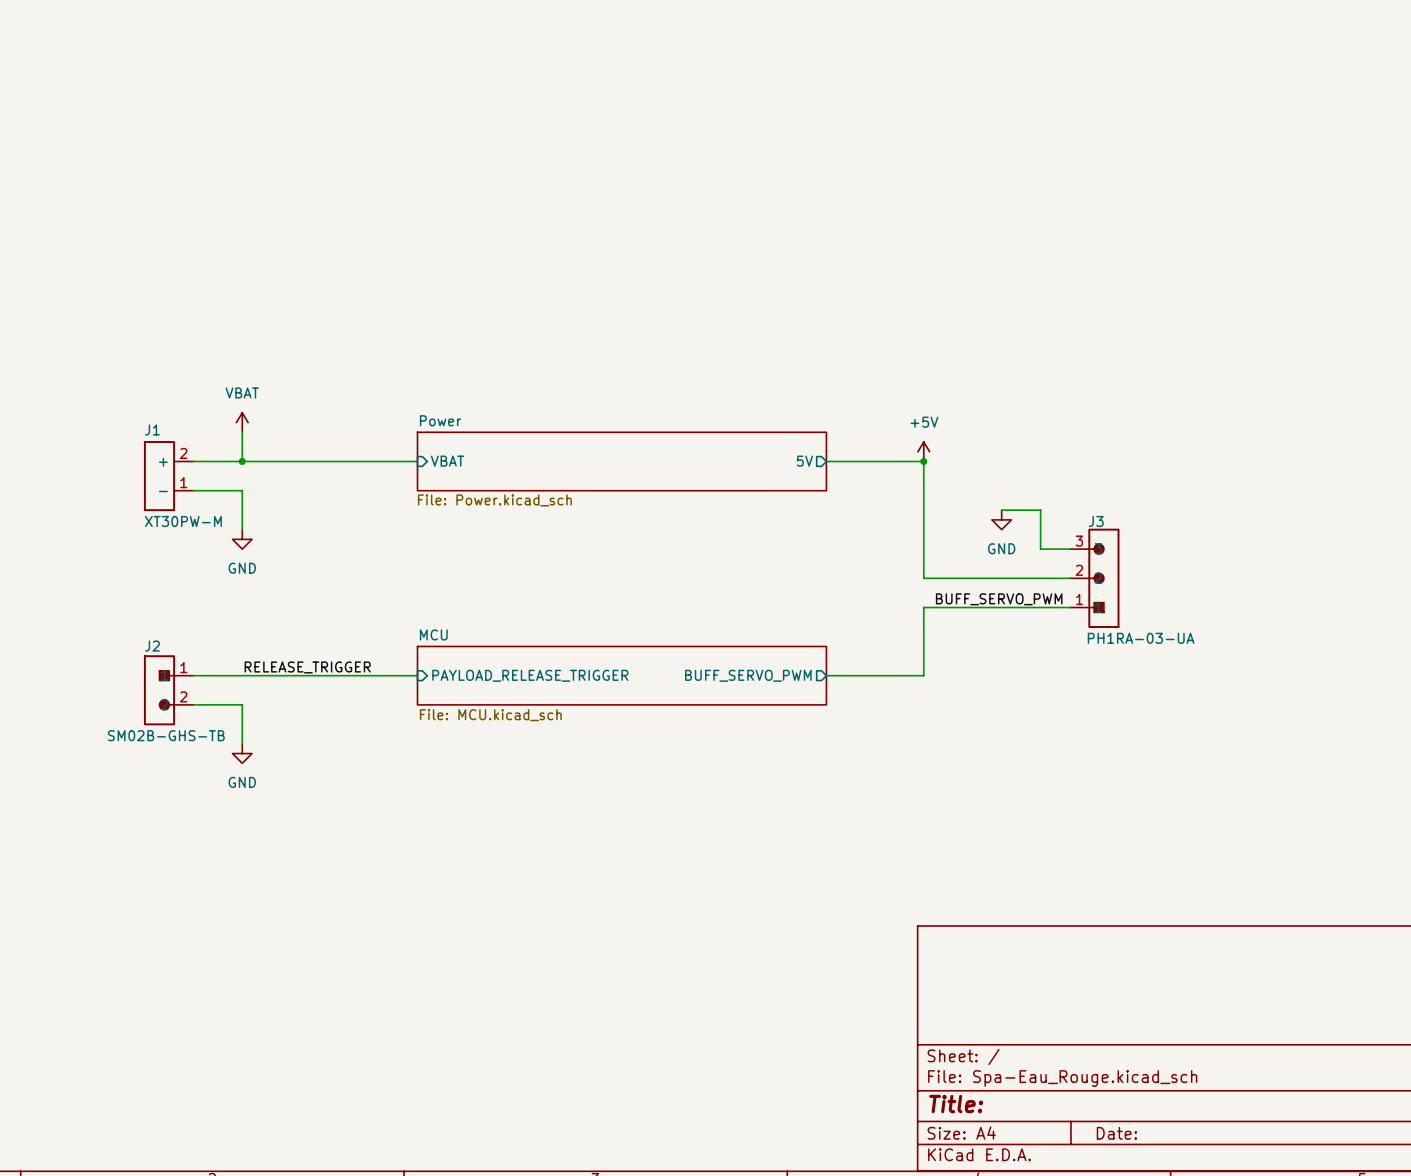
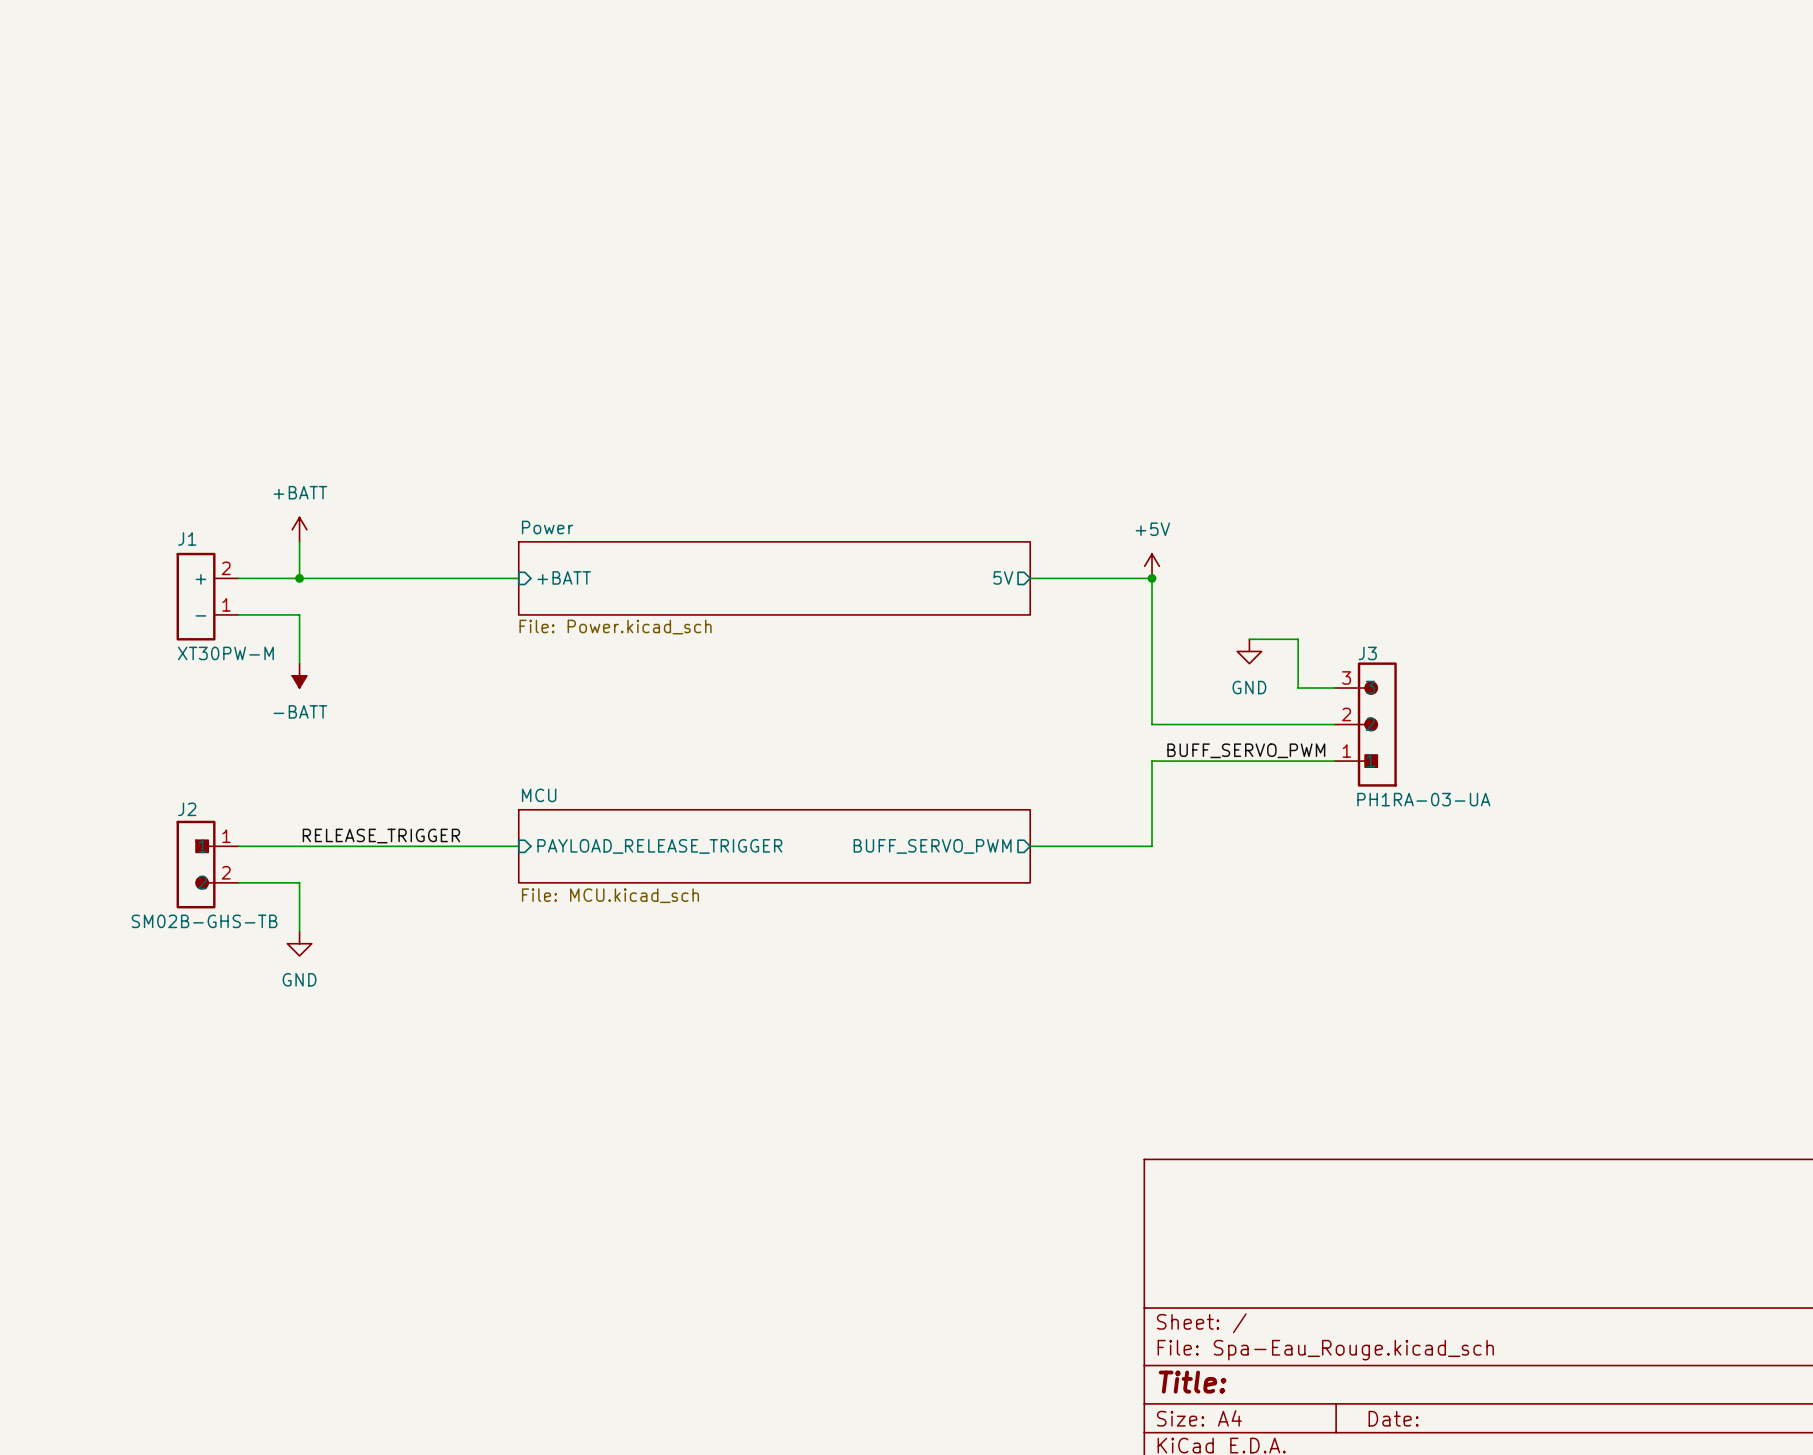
power symbol: VBAT (242, 422) -> +BATT (299, 529)
sheet pin: VBAT (447, 461) -> +BATT (564, 577)
power symbol: GND (242, 539) -> -BATT (299, 675)

